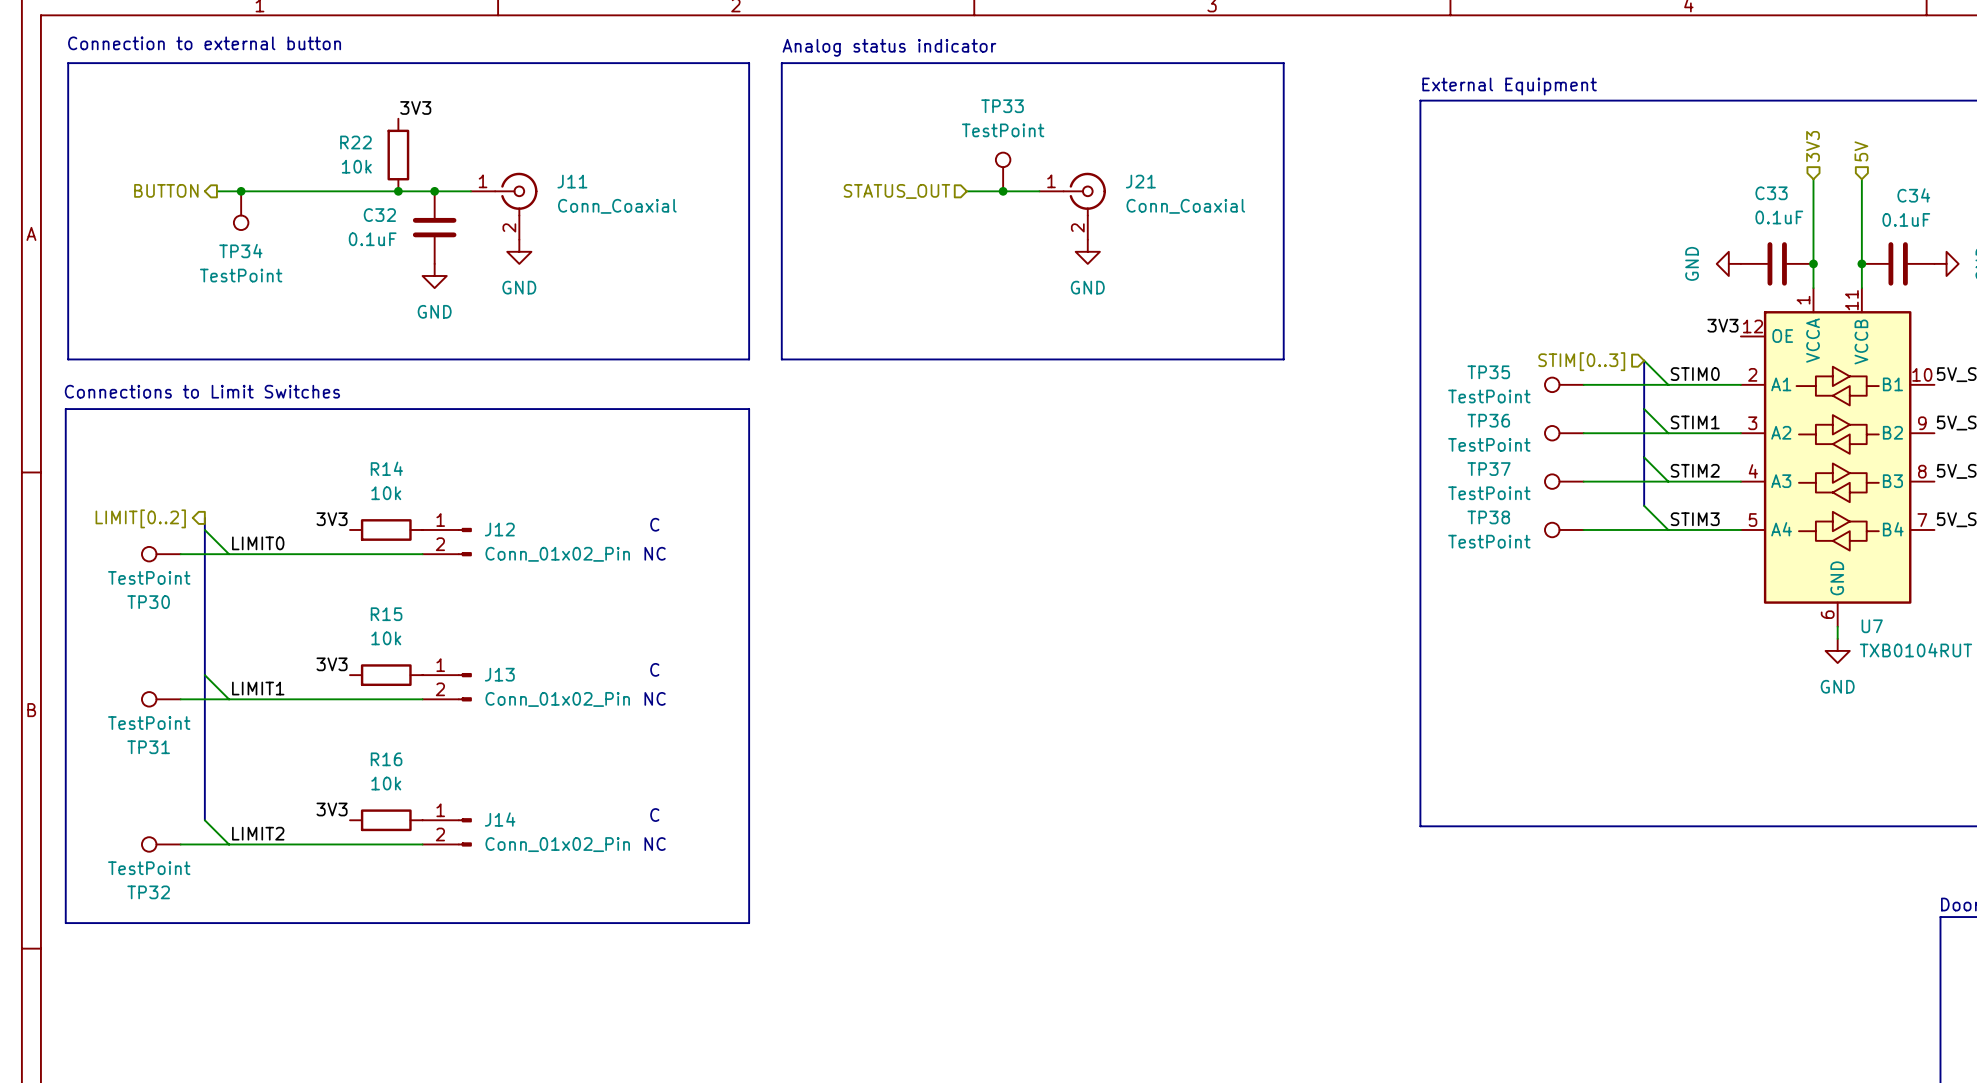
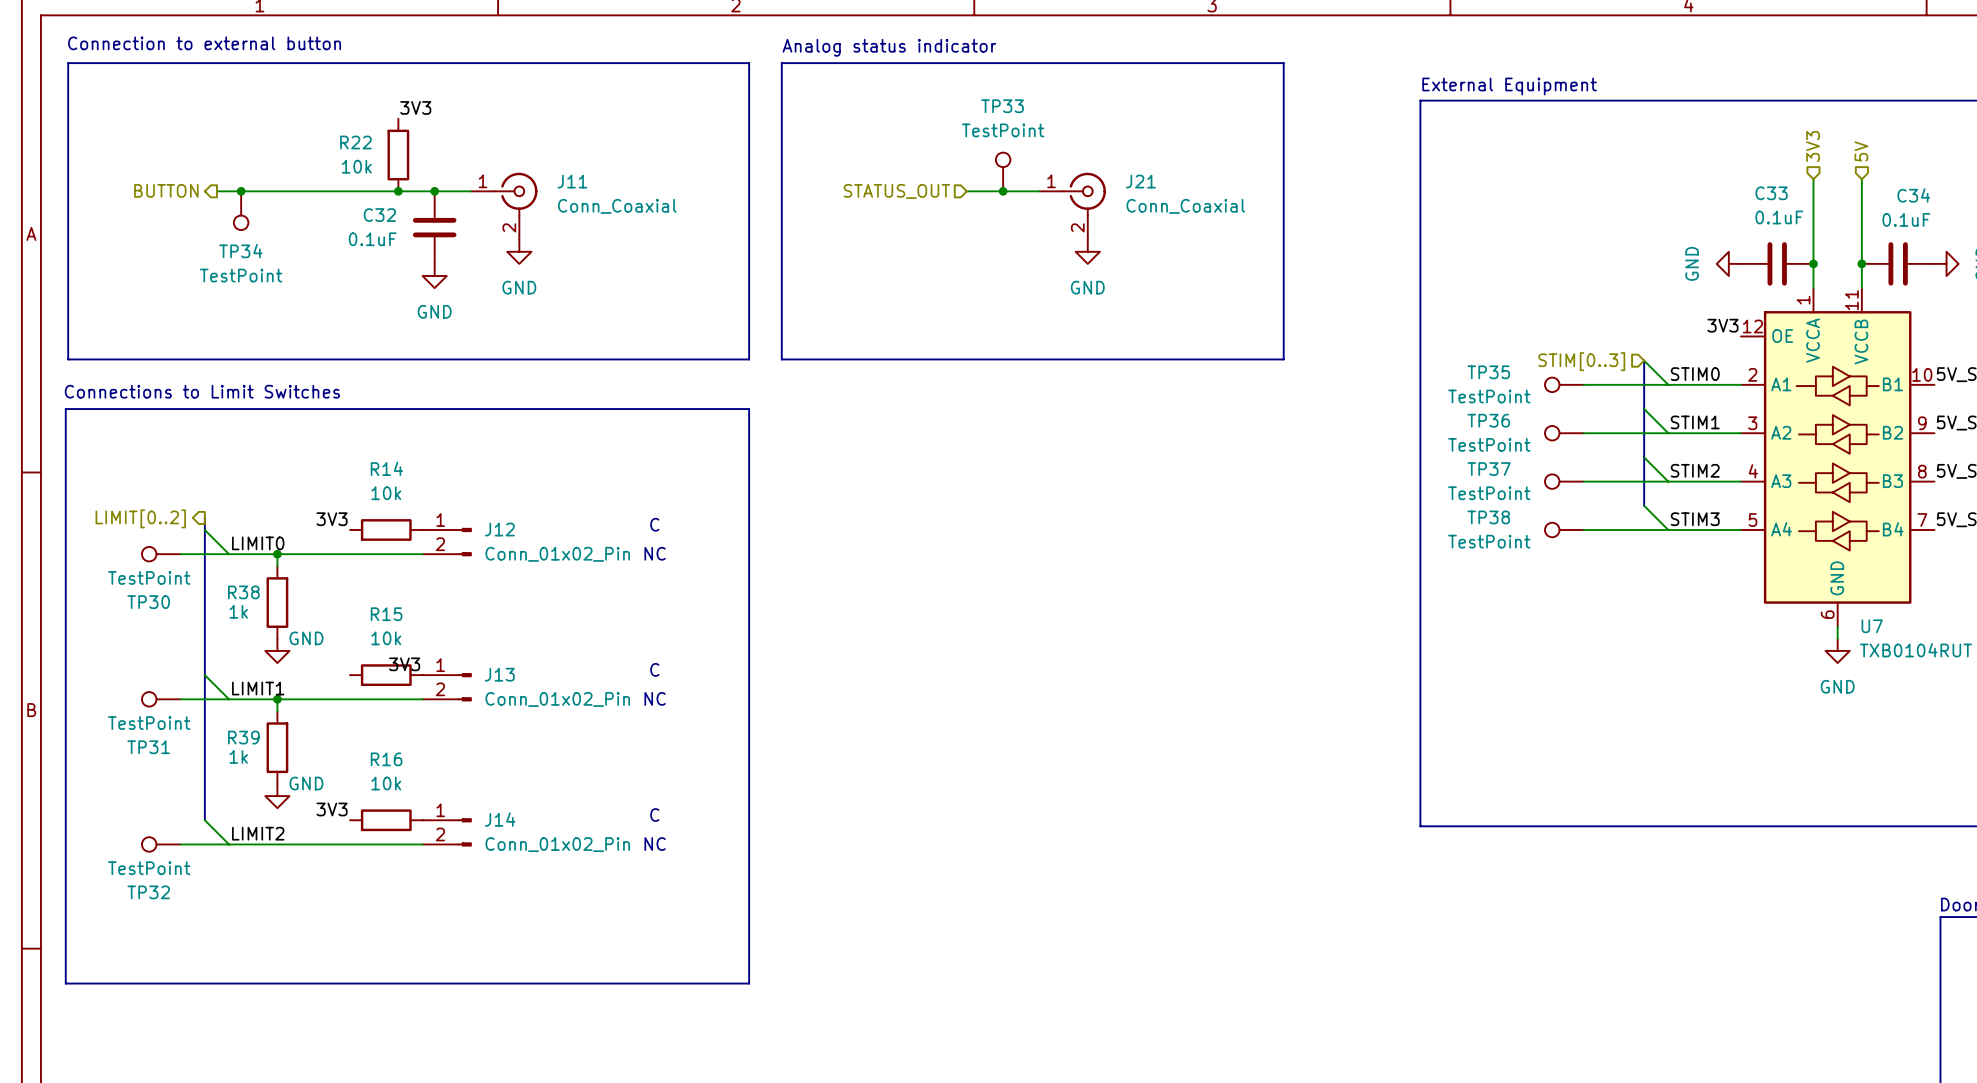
wire: none -> (277, 554) (277, 566)
junction: none -> (277, 554)
R38: none -> 1k (277, 602)
power symbol: none -> GND (277, 650)
label position: 3V3 (332, 664) -> 3V3 (404, 664)
wire: none -> (277, 699) (277, 711)
junction: none -> (277, 699)
R39: none -> 1k (277, 747)
power symbol: none -> GND (277, 796)
line: (65, 923) (749, 923) -> (65, 923) (65, 983) (749, 983) (749, 923)

